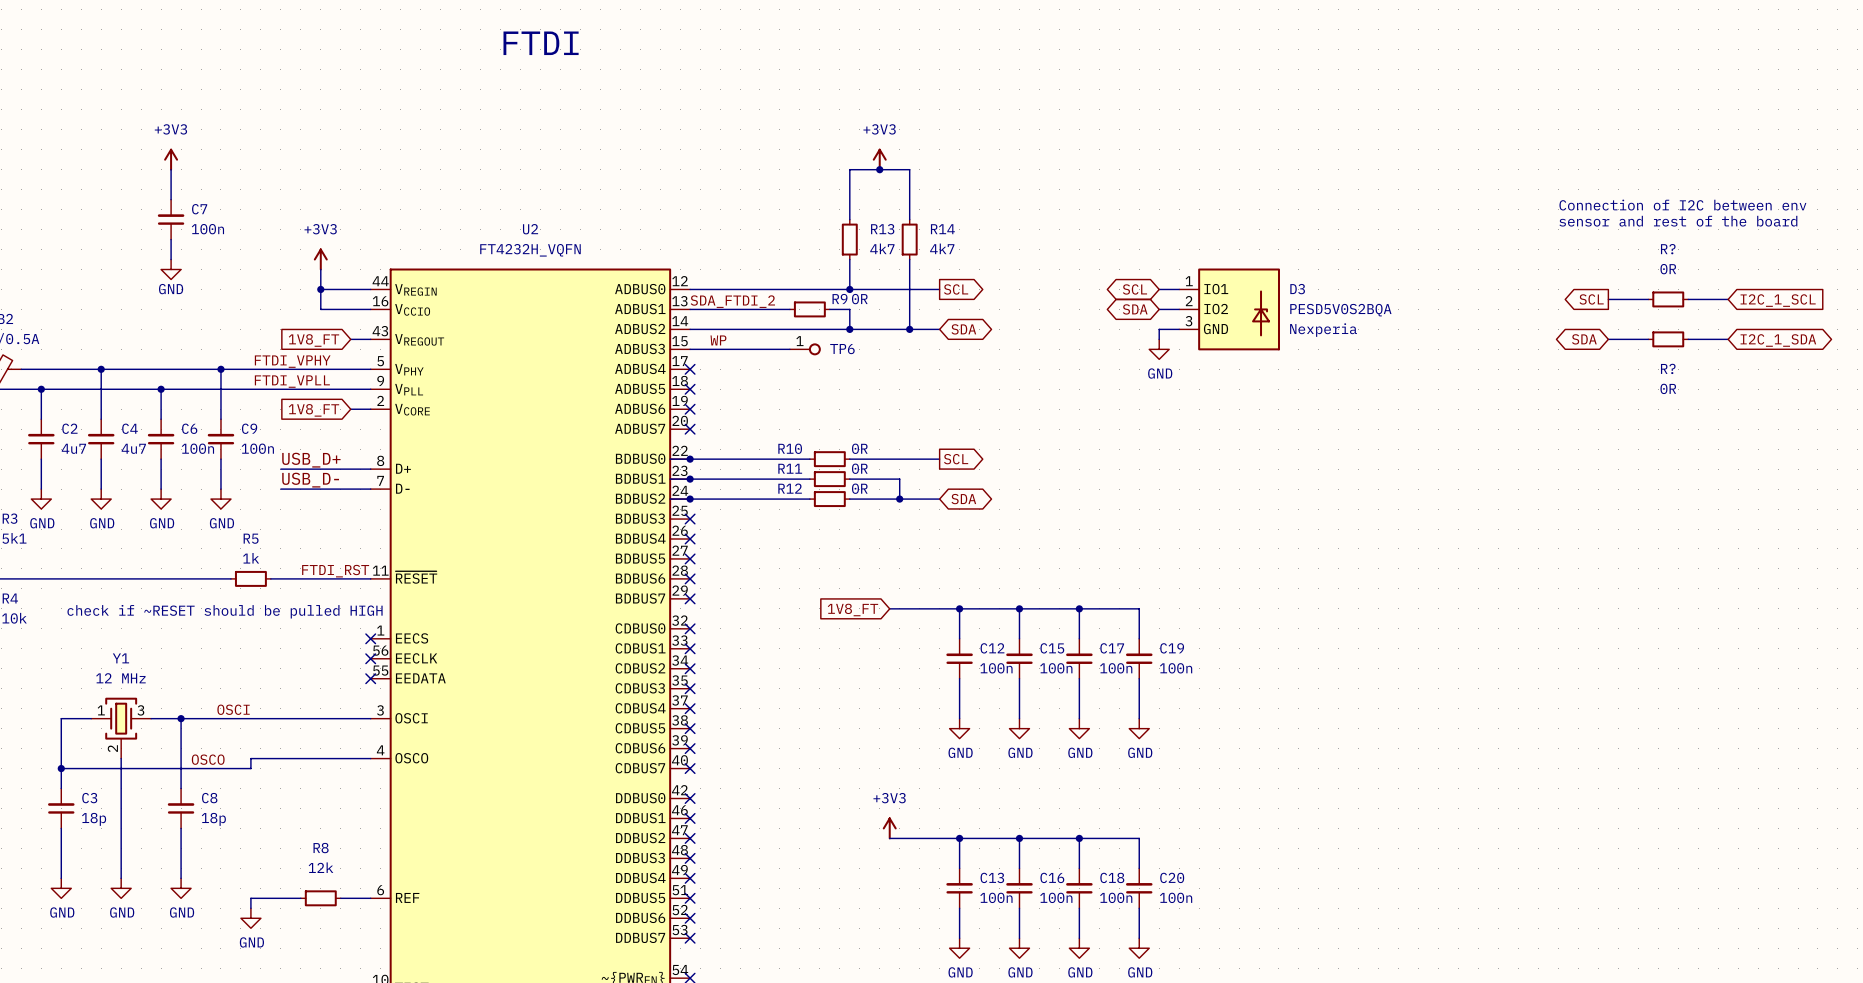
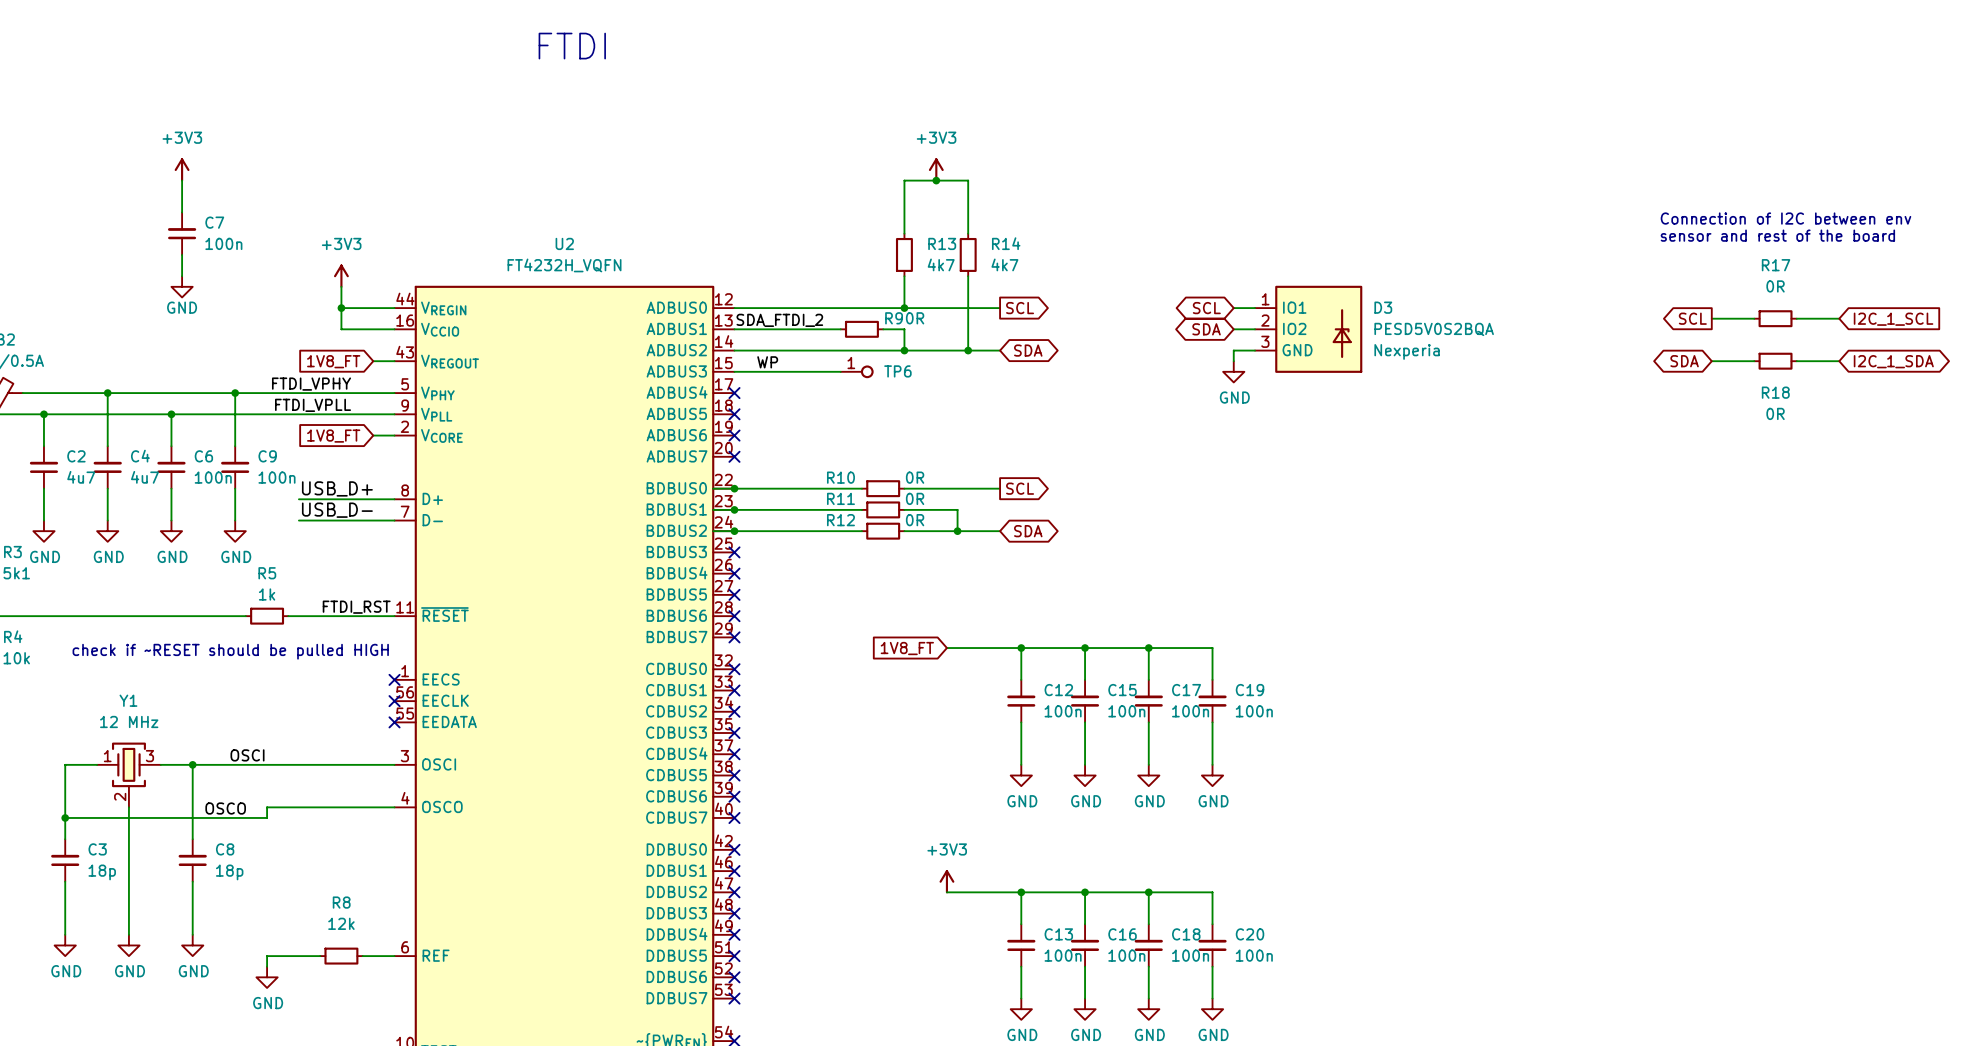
R? name: R? (1668, 249) -> R17 (1776, 265)
R? name: R? (1668, 368) -> R18 (1775, 392)

